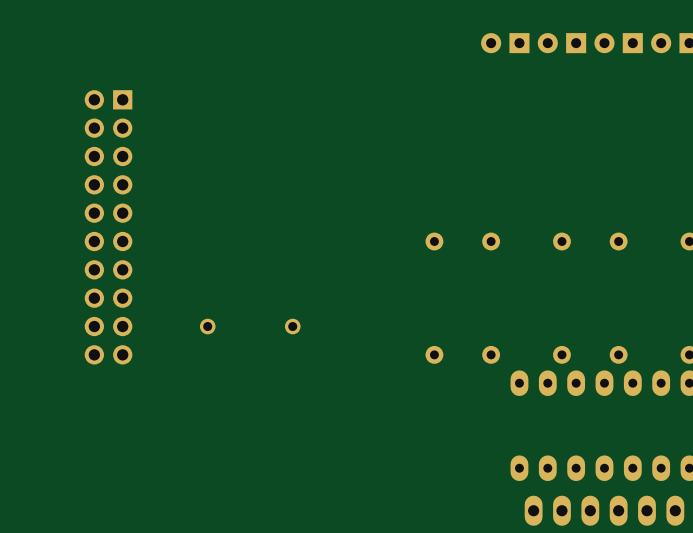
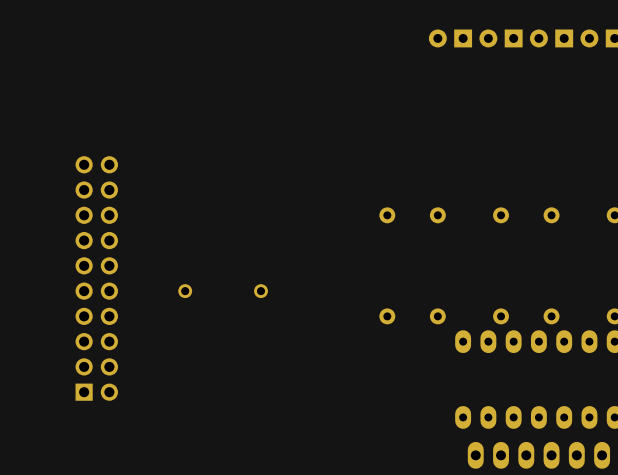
part rotation: 0° (108, 227) -> 180° (96, 278)

